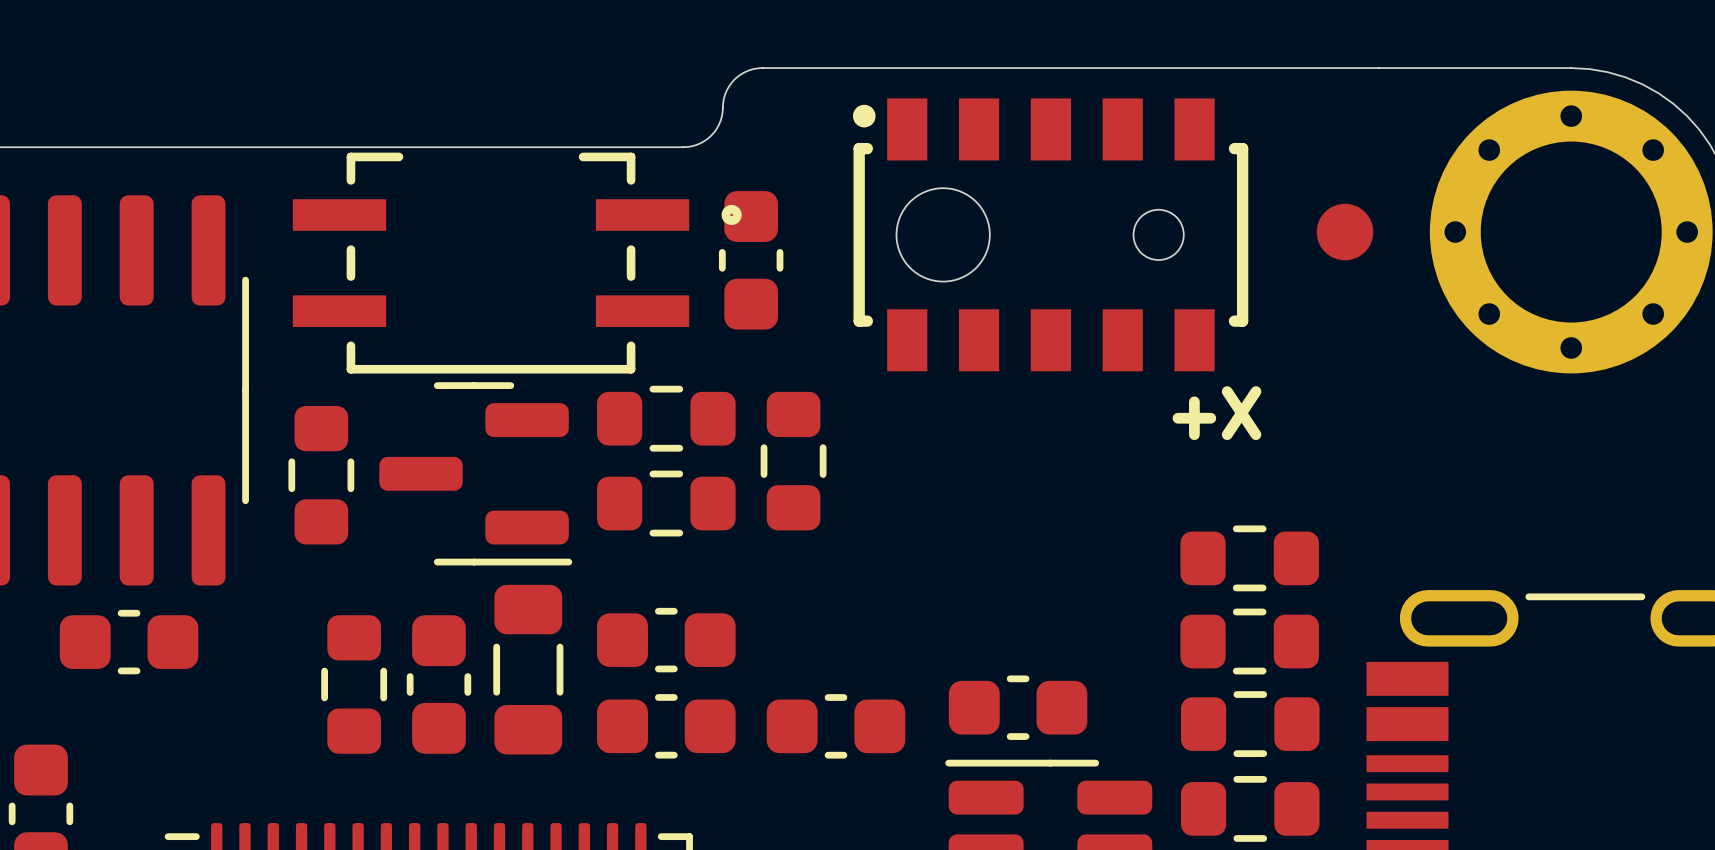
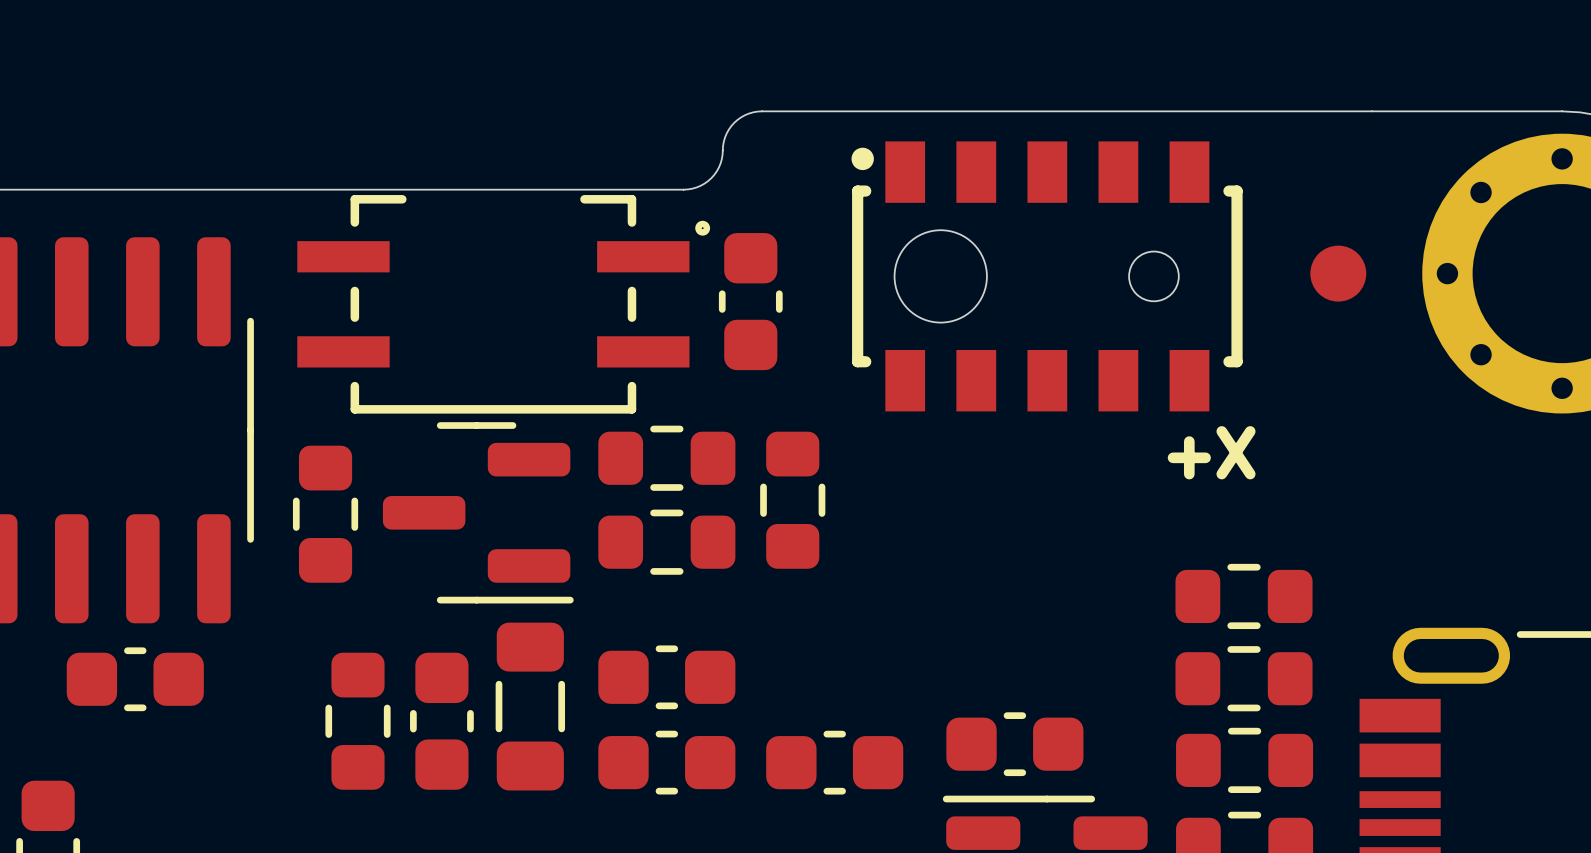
part footprint: [292, 152, 742, 374] -> [297, 195, 711, 414]

